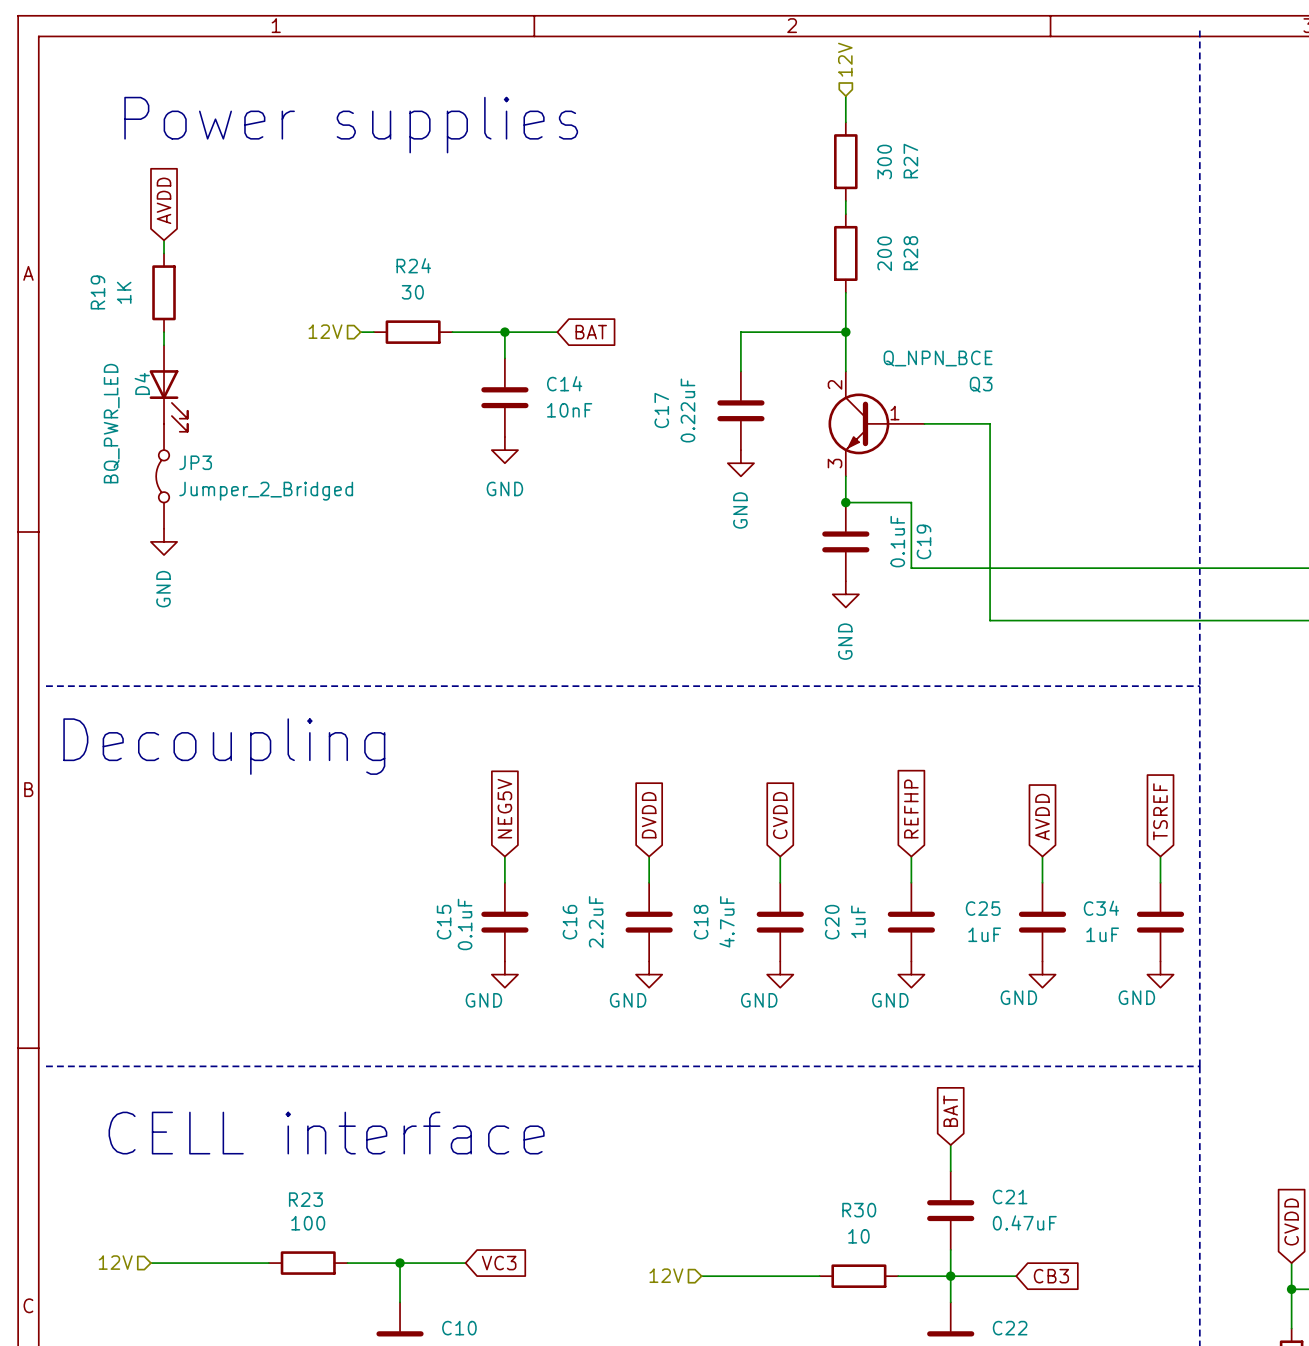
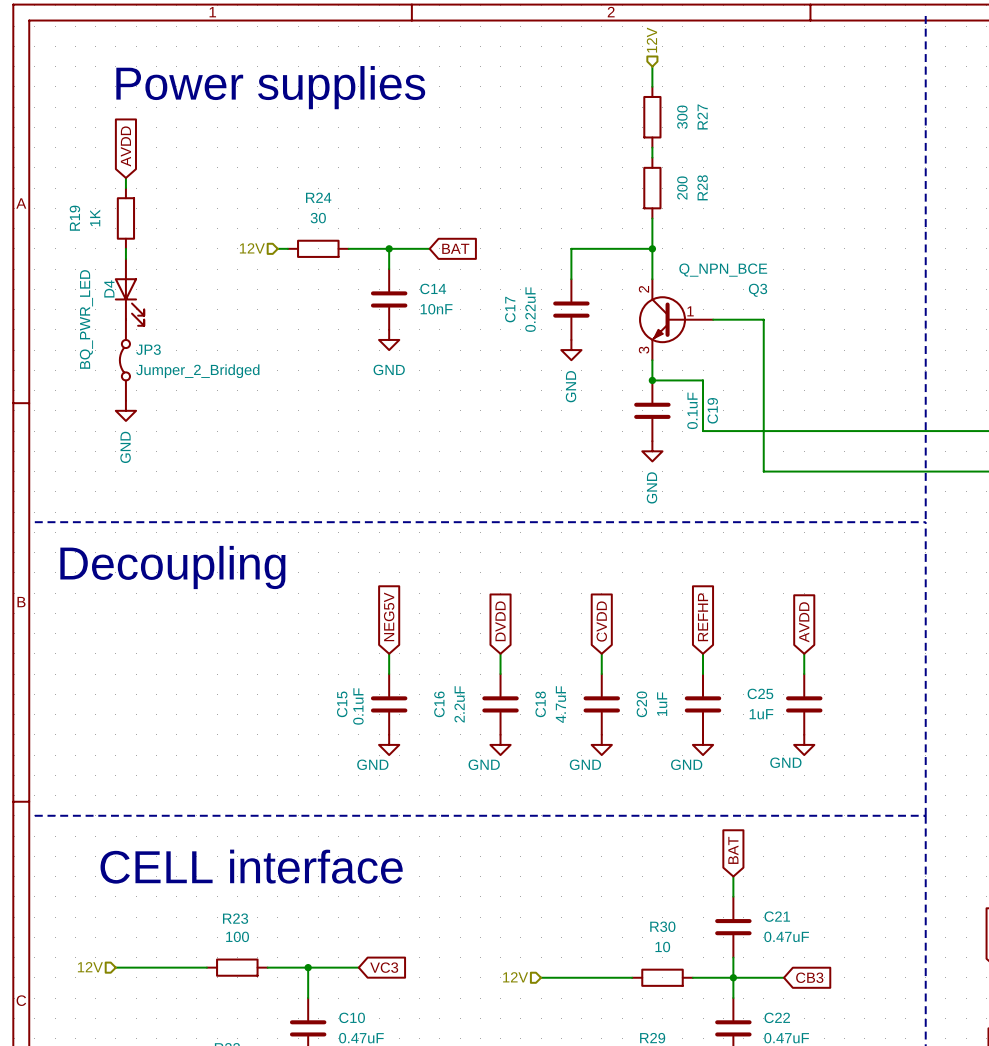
global label: TSREF (1160, 811) -> none
wire: (1160, 856) (1160, 882) -> none
C34: 1uF (1160, 922) -> none
power symbol: GND (1160, 974) -> none

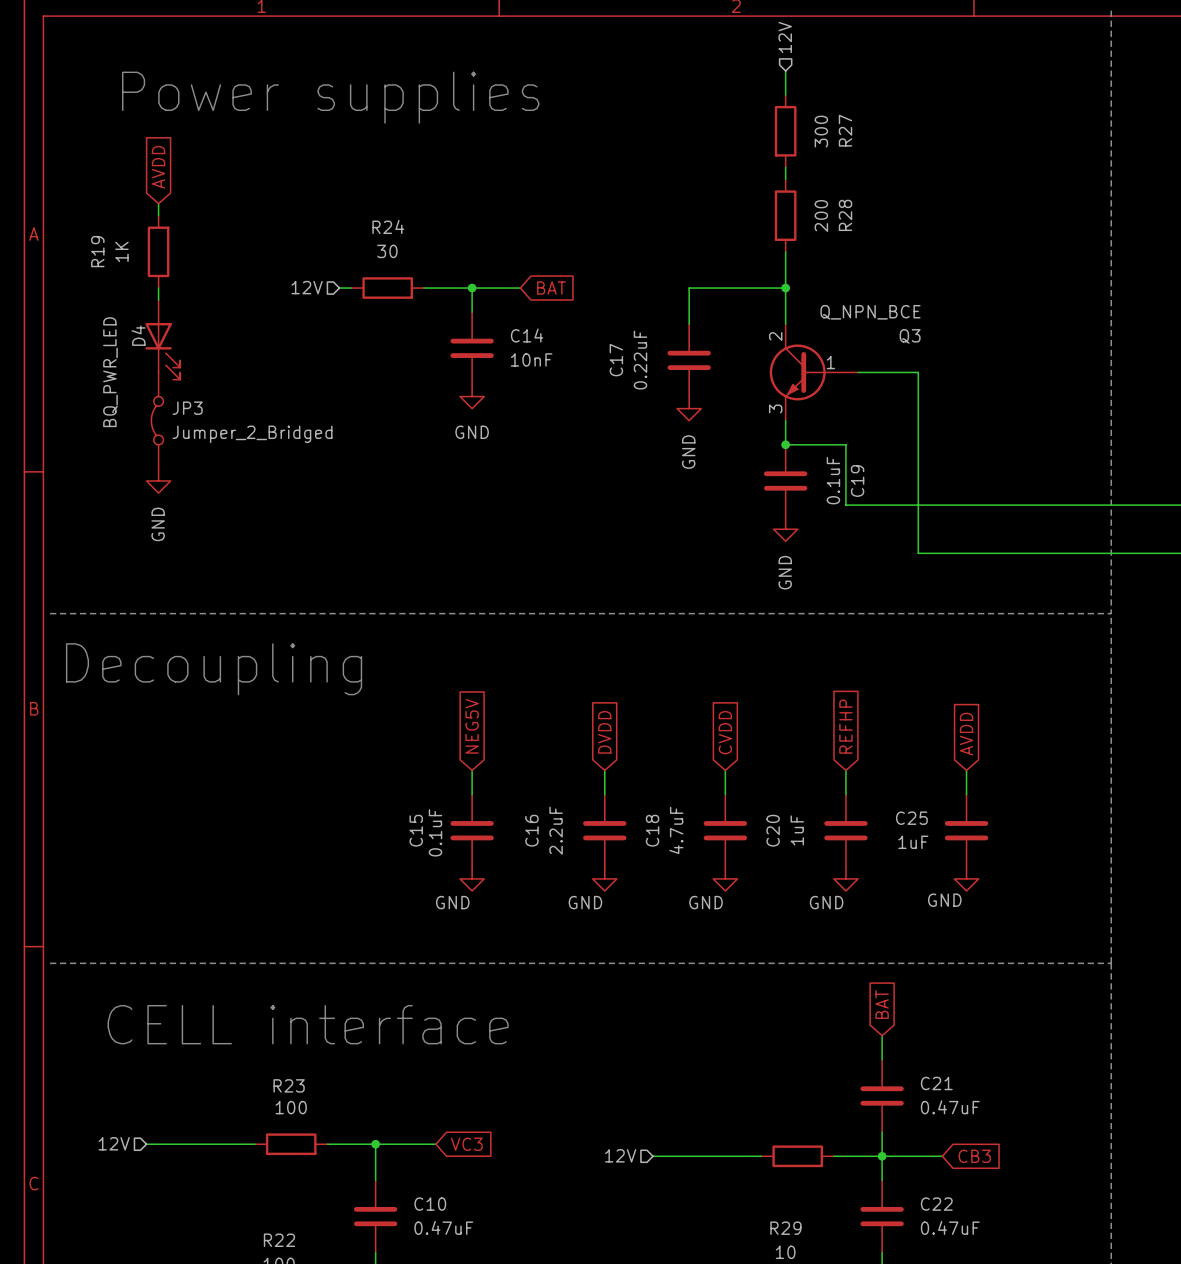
R30 name: R30 (662, 926) -> none
R30 value: 10 (662, 947) -> none

